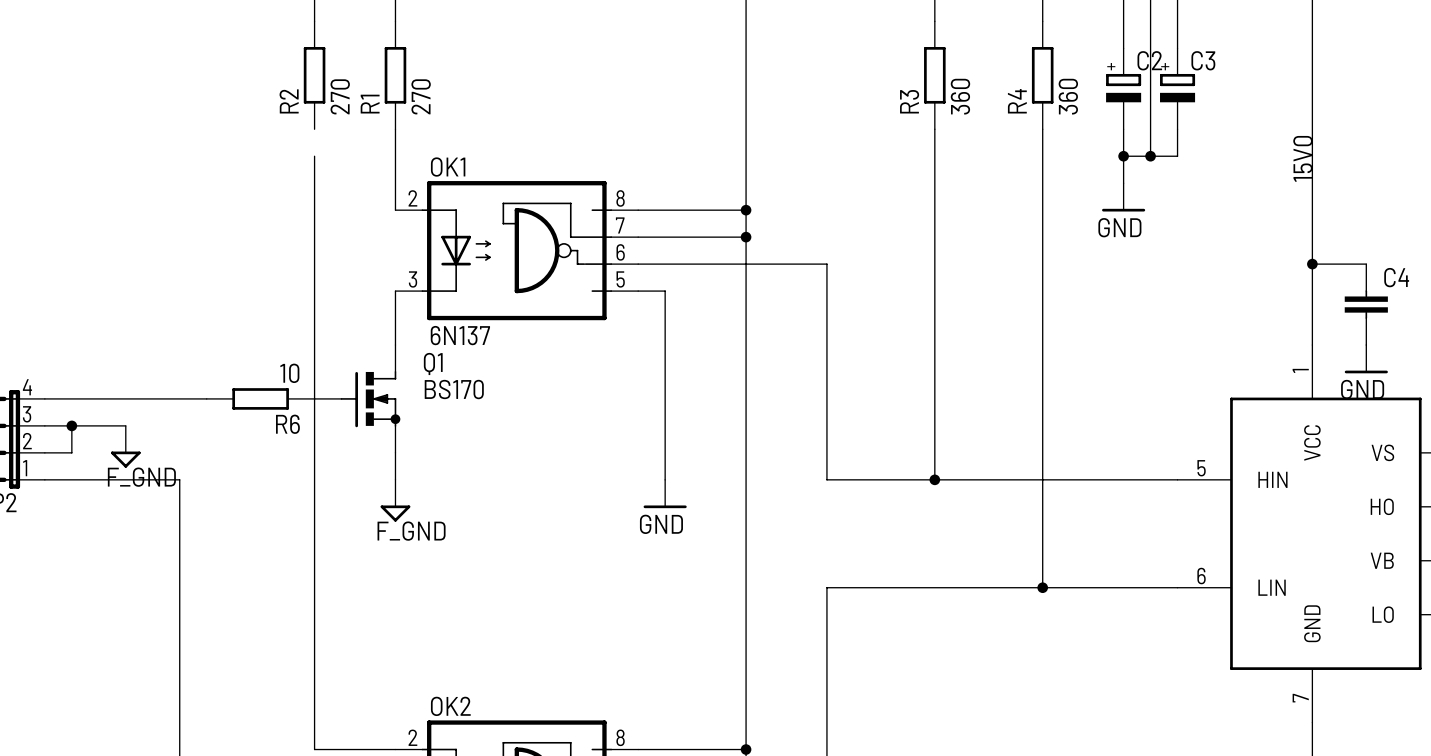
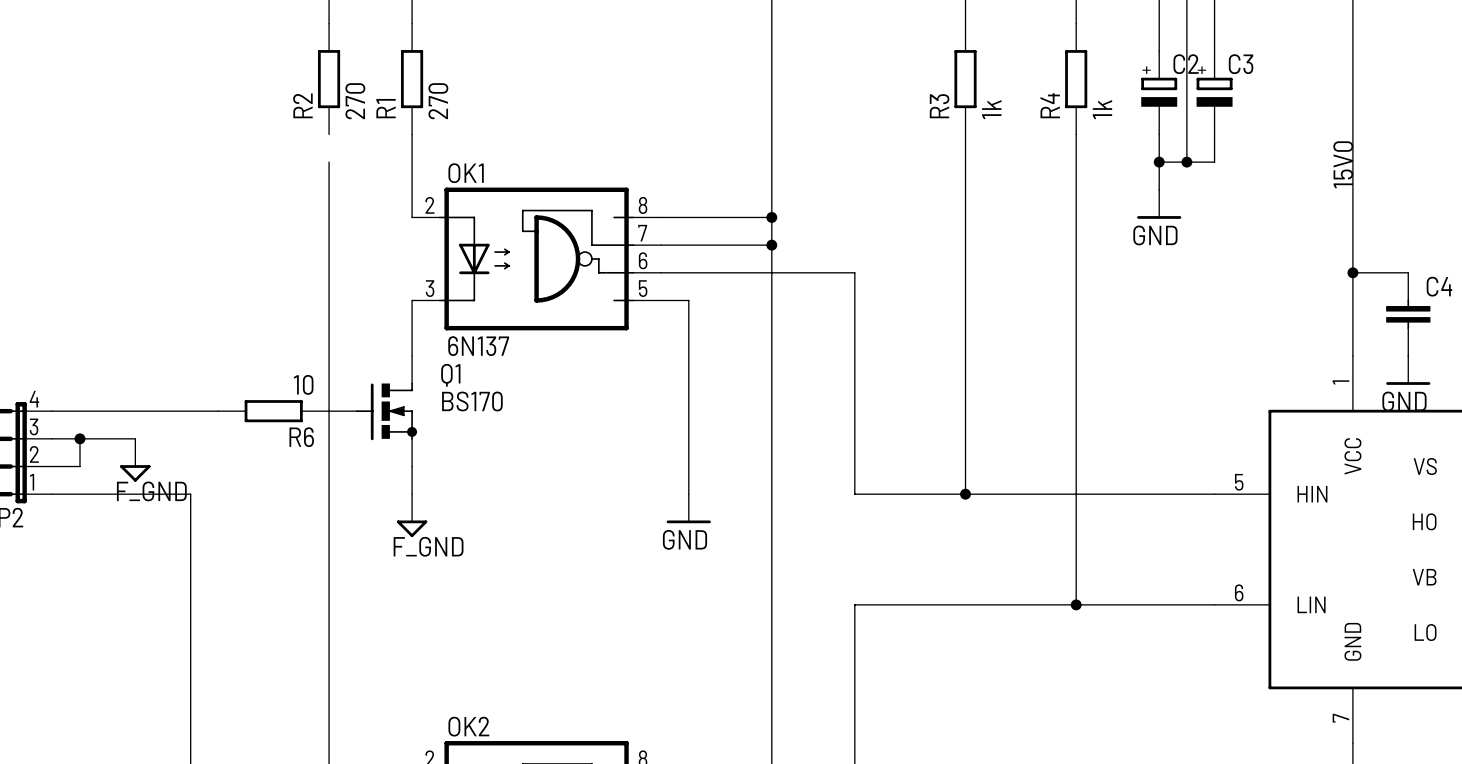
R3 value: 360 (960, 96) -> 1k (991, 109)
R4 value: 360 (1068, 96) -> 1k (1102, 109)

